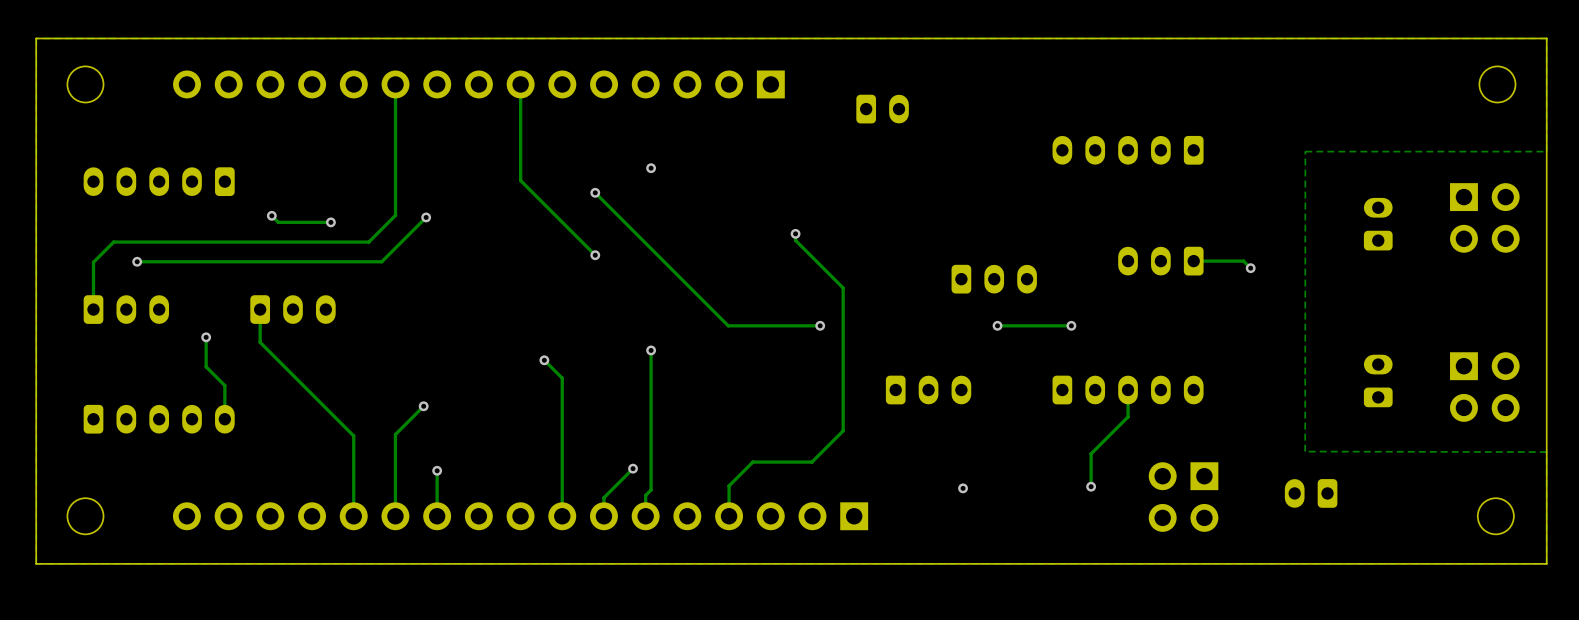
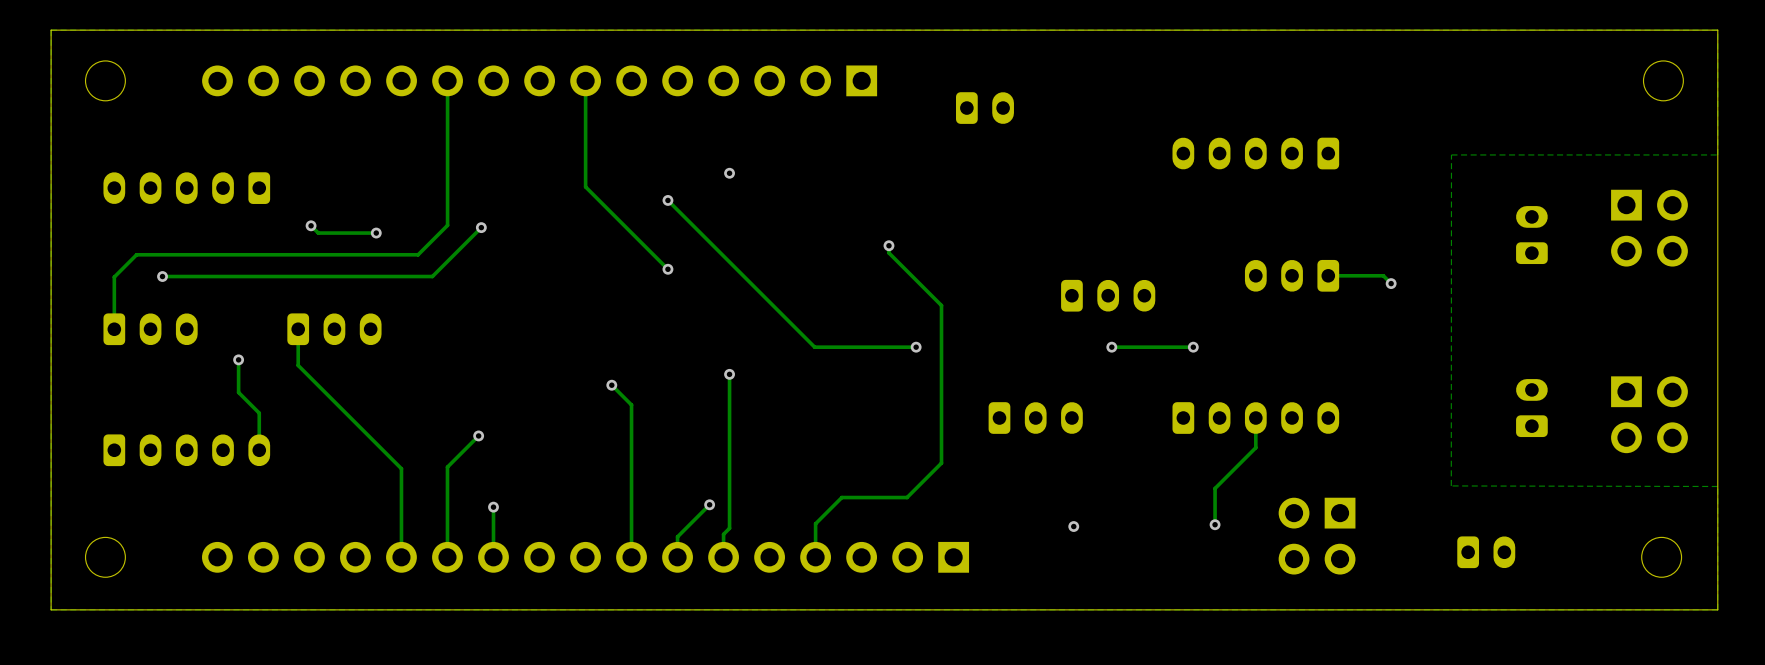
part rotation: 0° (1311, 493) -> 180° (1486, 552)
part position: (1311, 493) -> (1486, 552)

